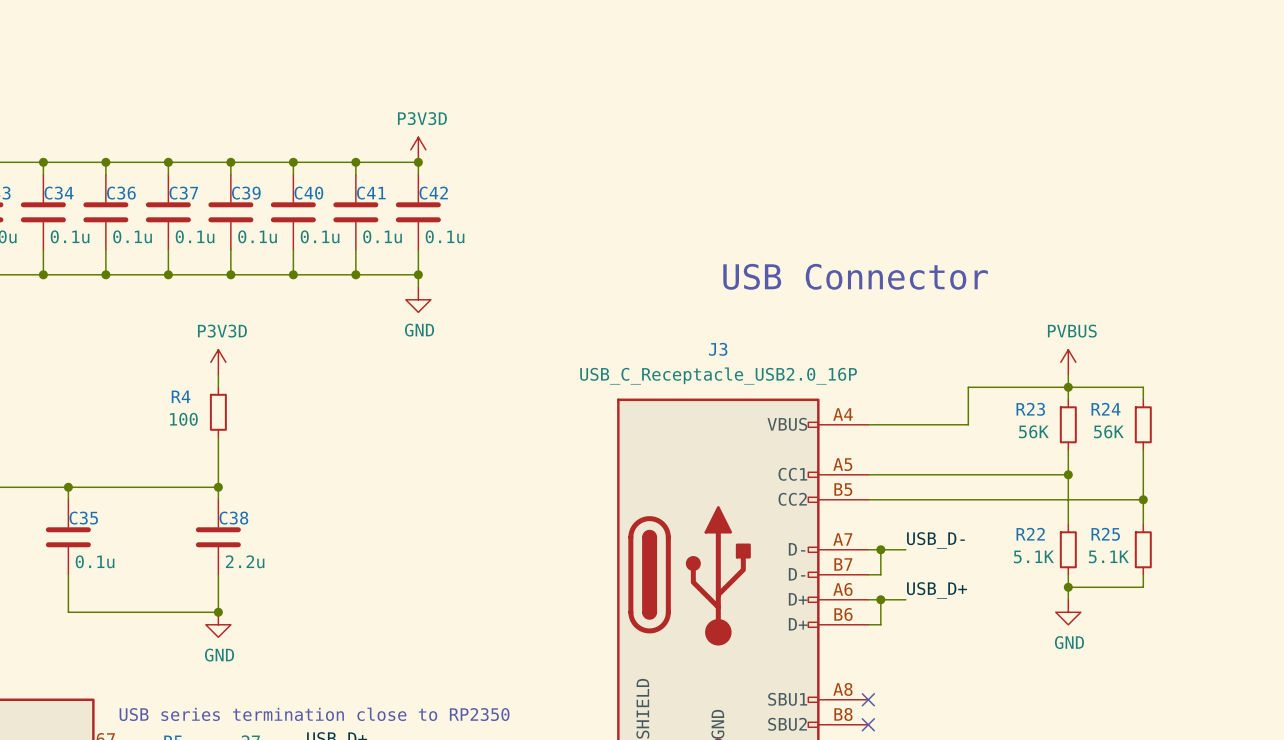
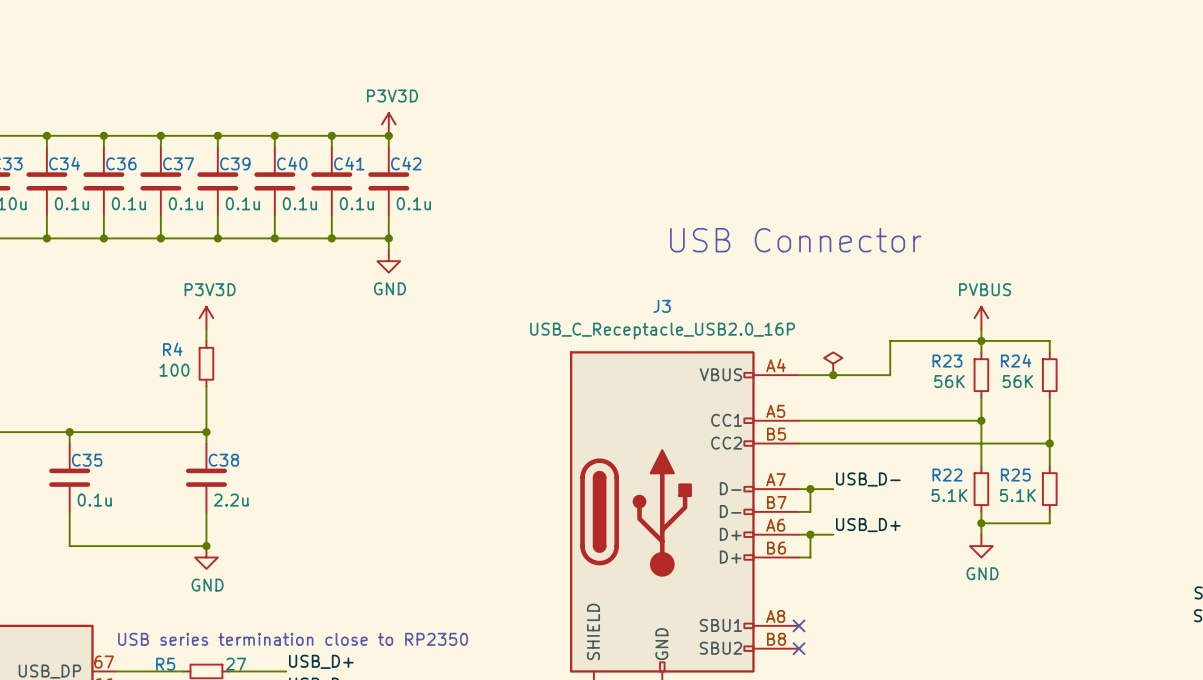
power symbol: none -> (833, 363)
junction: none -> (833, 375)

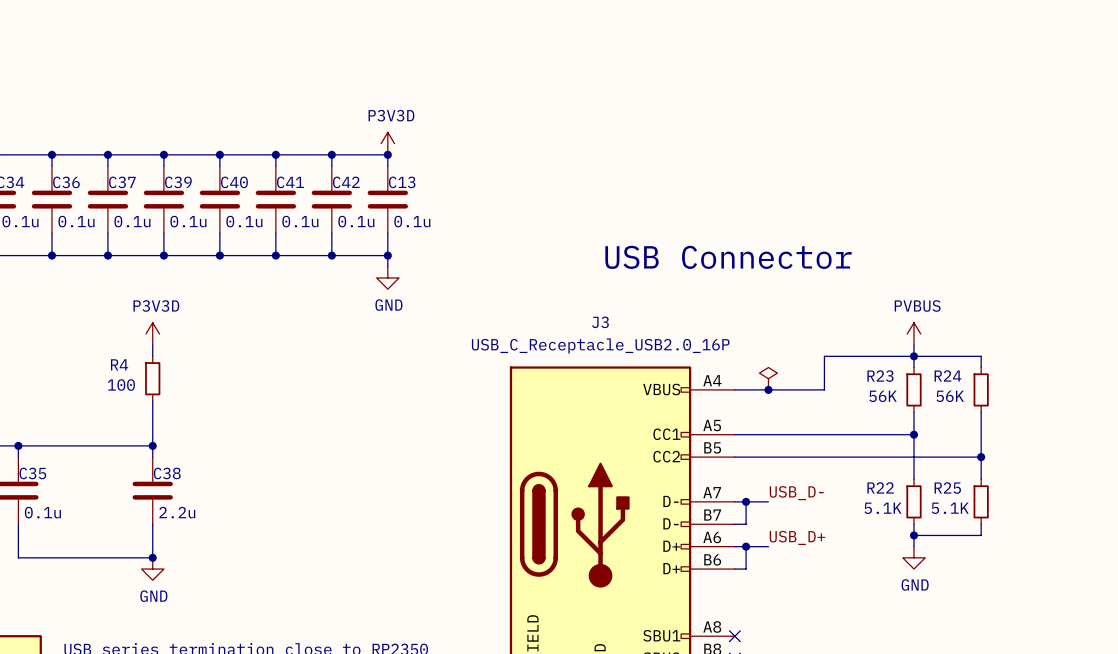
power symbol position: P3V3D (388, 124) -> P3V3D (387, 143)
wire: none -> (331, 154) (387, 154) (387, 166)
junction: none -> (387, 154)
C13: none -> 0.1u (387, 199)
wire: none -> (387, 233) (387, 266)
wire: (388, 238) (388, 249) -> (331, 255) (387, 255)
junction: none -> (387, 255)
power symbol position: GND (388, 261) -> GND (387, 277)

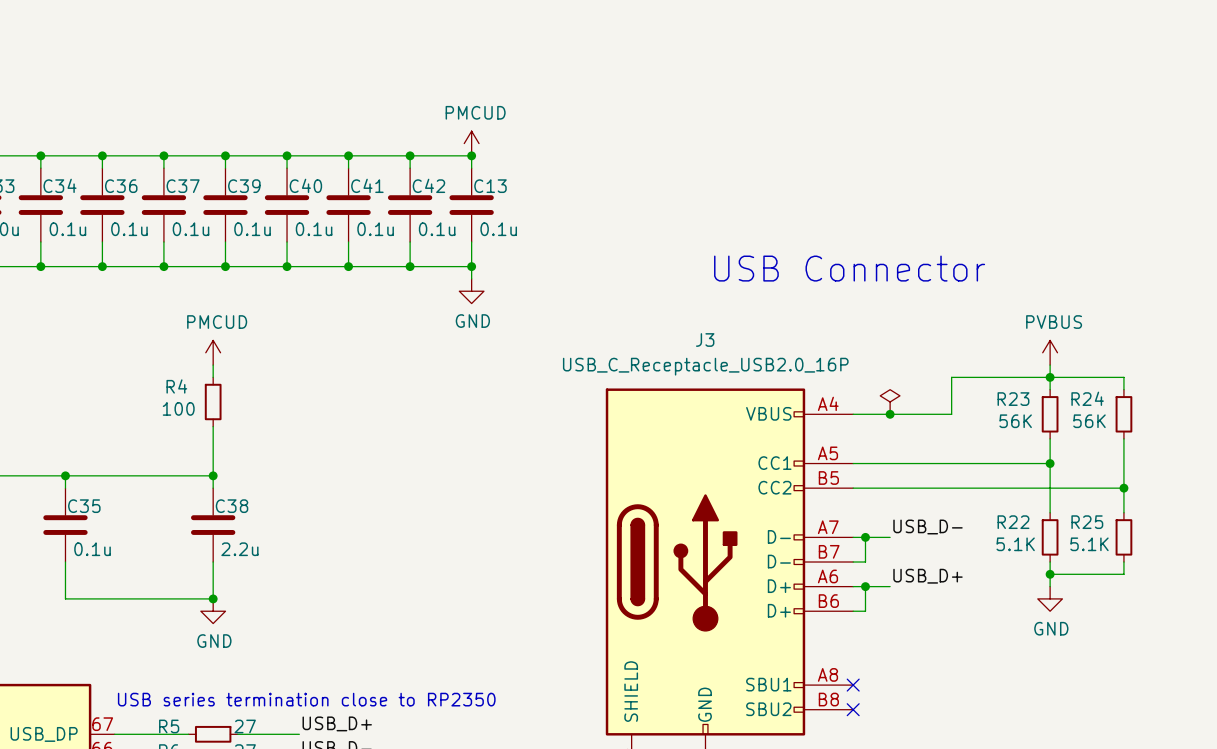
power symbol: P3V3D (387, 143) -> PMCUD (471, 143)
power symbol: P3V3D (152, 333) -> PMCUD (213, 352)

